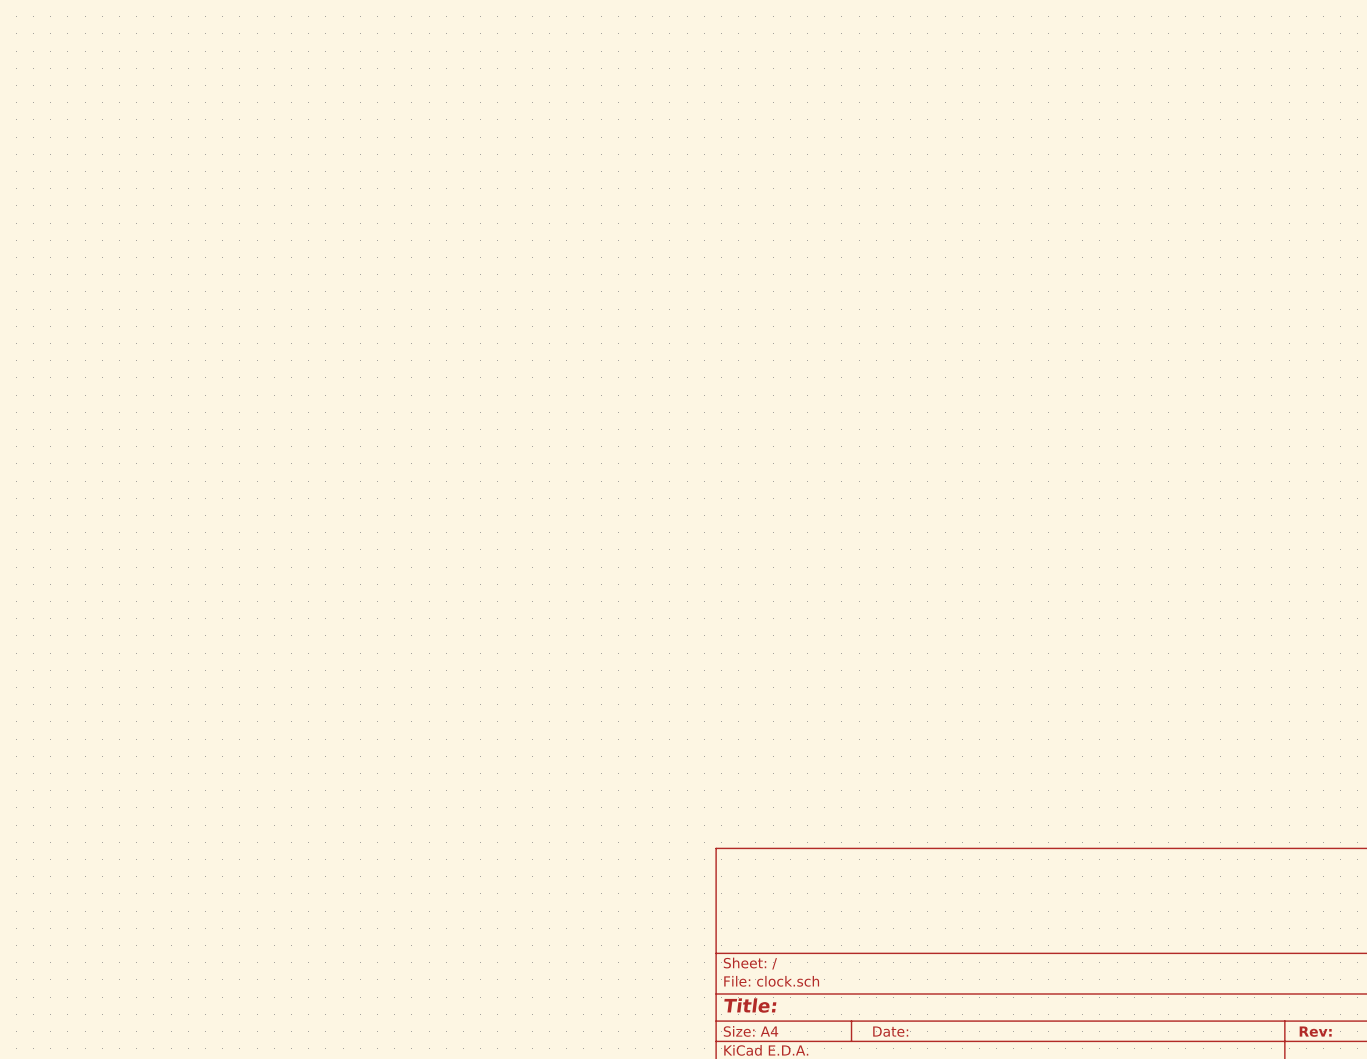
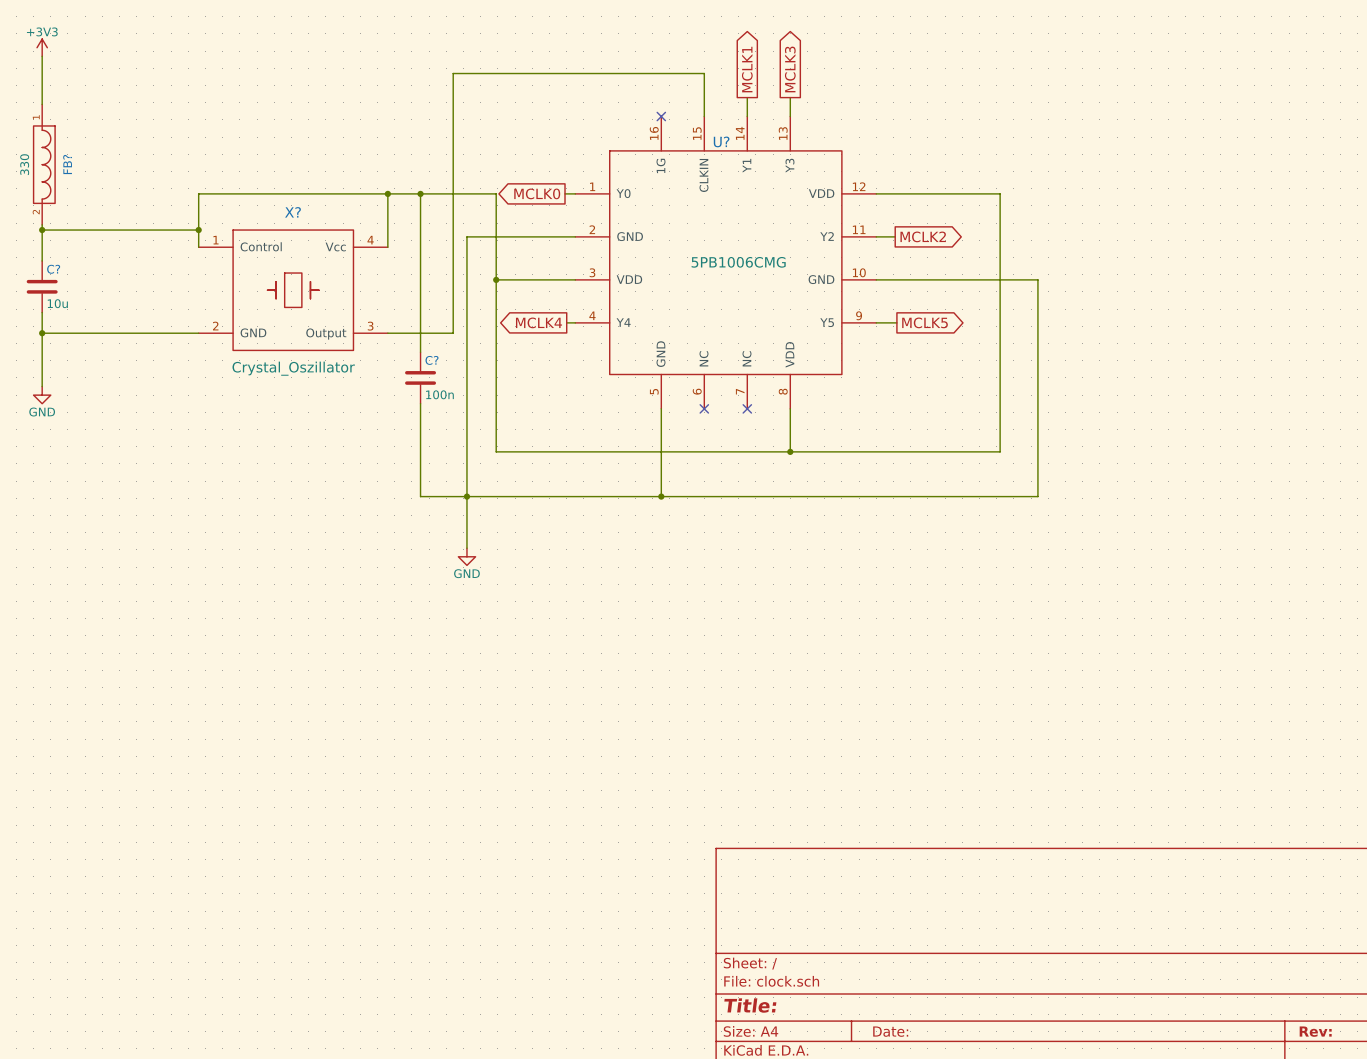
power symbol: none -> +3V3 (42, 47)
wire: none -> (42, 56) (42, 104)
global label: none -> MCLK1 (747, 69)
global label: none -> MCLK3 (790, 69)
wire: none -> (747, 97) (747, 116)
wire: none -> (790, 97) (790, 116)
no-connect mark: none -> (661, 116)
wire: none -> (704, 116) (704, 73) (453, 73) (453, 333) (387, 333)
FB?: none -> 330 (44, 164)
wire: none -> (387, 193) (387, 247)
junction: none -> (387, 193)
wire: none -> (420, 193) (420, 352)
junction: none -> (420, 193)
global label: none -> MCLK0 (537, 193)
wire: none -> (565, 193) (575, 193)
wire: none -> (876, 193) (1000, 193) (1000, 451) (496, 451) (496, 193) (198, 193) (198, 247)
wire: none -> (42, 224) (42, 260)
wire: none -> (42, 230) (198, 230)
junction: none -> (42, 230)
junction: none -> (198, 230)
wire: none -> (575, 236) (466, 236) (466, 548)
wire: none -> (876, 236) (895, 236)
global label: none -> MCLK2 (923, 236)
U?: none -> 5PB1006CMG (725, 262)
wire: none -> (496, 279) (575, 279)
junction: none -> (496, 279)
wire: none -> (876, 279) (1037, 279) (1037, 496) (420, 496) (420, 403)
C?: none -> 10u (42, 286)
X?: none -> Crystal_Oszillator (293, 290)
wire: none -> (42, 312) (42, 386)
global label: none -> MCLK4 (539, 322)
wire: none -> (566, 322) (575, 322)
wire: none -> (876, 322) (896, 322)
global label: none -> MCLK5 (925, 322)
wire: none -> (42, 333) (198, 333)
junction: none -> (42, 333)
C?: none -> 100n (420, 377)
power symbol: none -> GND (42, 395)
wire: none -> (661, 408) (661, 496)
no-connect mark: none -> (704, 408)
no-connect mark: none -> (747, 408)
wire: none -> (790, 408) (790, 451)
junction: none -> (790, 451)
junction: none -> (466, 496)
junction: none -> (661, 496)
power symbol: none -> GND (466, 556)

